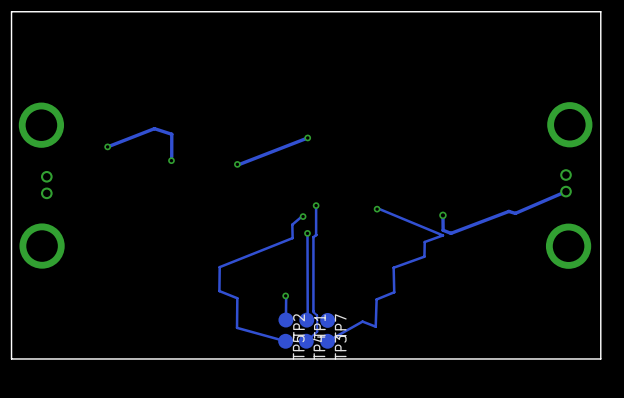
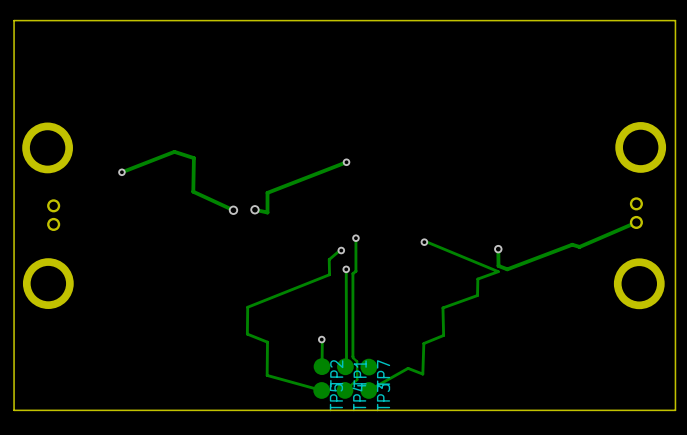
track: (171, 134) (171, 160) -> (193, 158) (193, 191) (233, 210)
via: (171, 160) -> none
via: (237, 164) -> none
track: none -> (267, 192) (267, 212) (254, 209)
via: none -> (233, 210)
via: none -> (254, 209)

